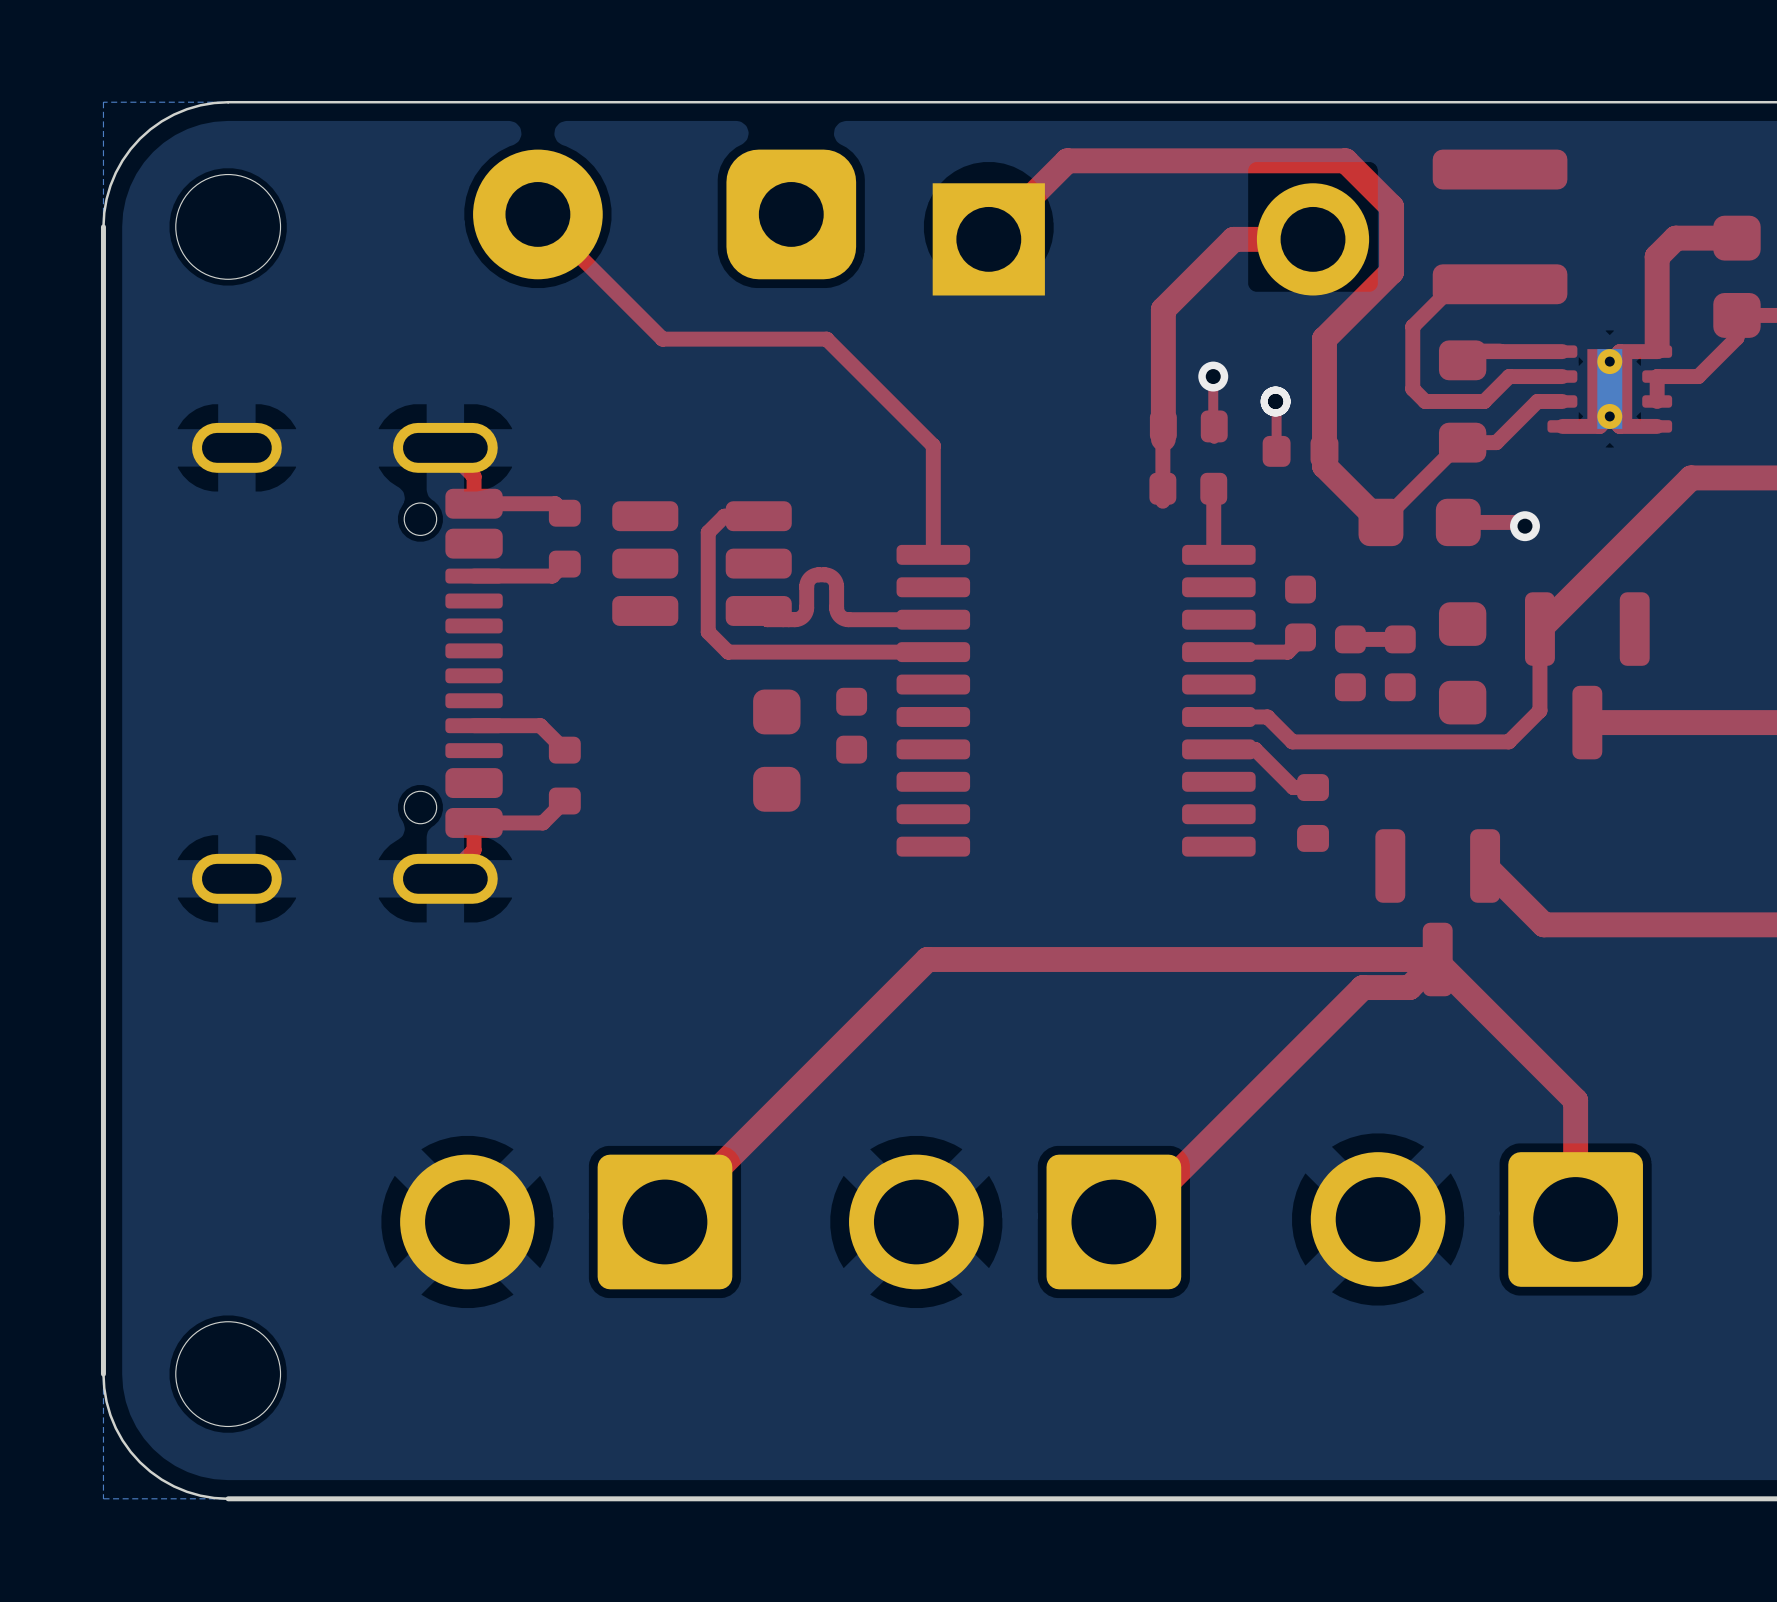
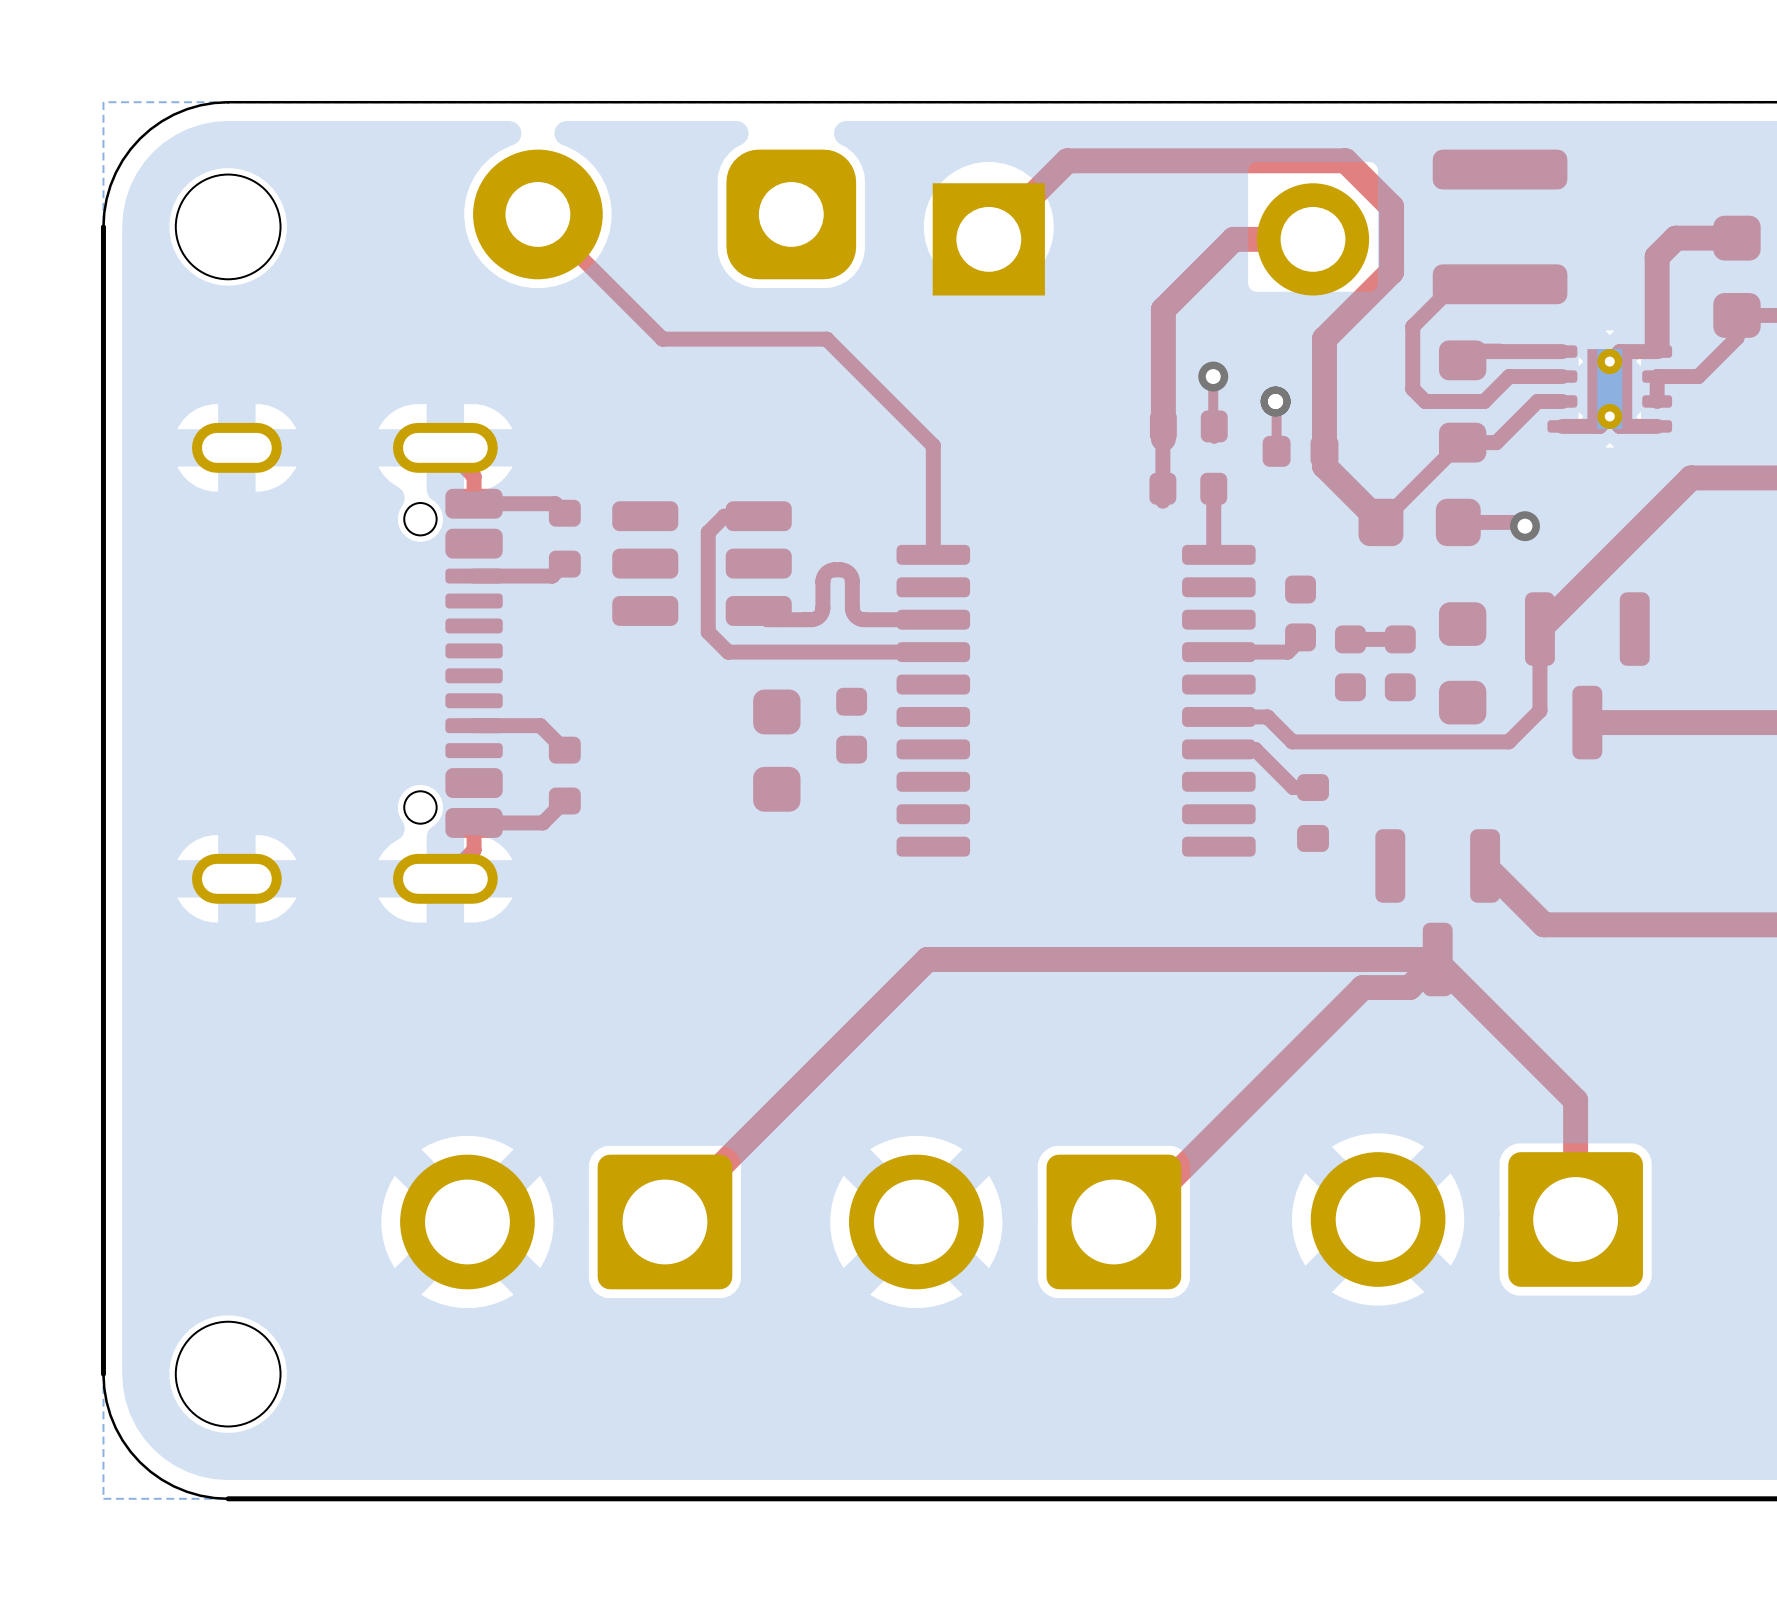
top track: (864, 619) (845, 619) (839, 615) (836, 609) (835, 582) (831, 576) (824, 574) (814, 575) (808, 580) (806, 611) (801, 617) (794, 619) -> (864, 619) (856, 617) (852, 610) (851, 577) (846, 571) (840, 569) (830, 570) (823, 577) (822, 609) (819, 616) (812, 619) (794, 619)

